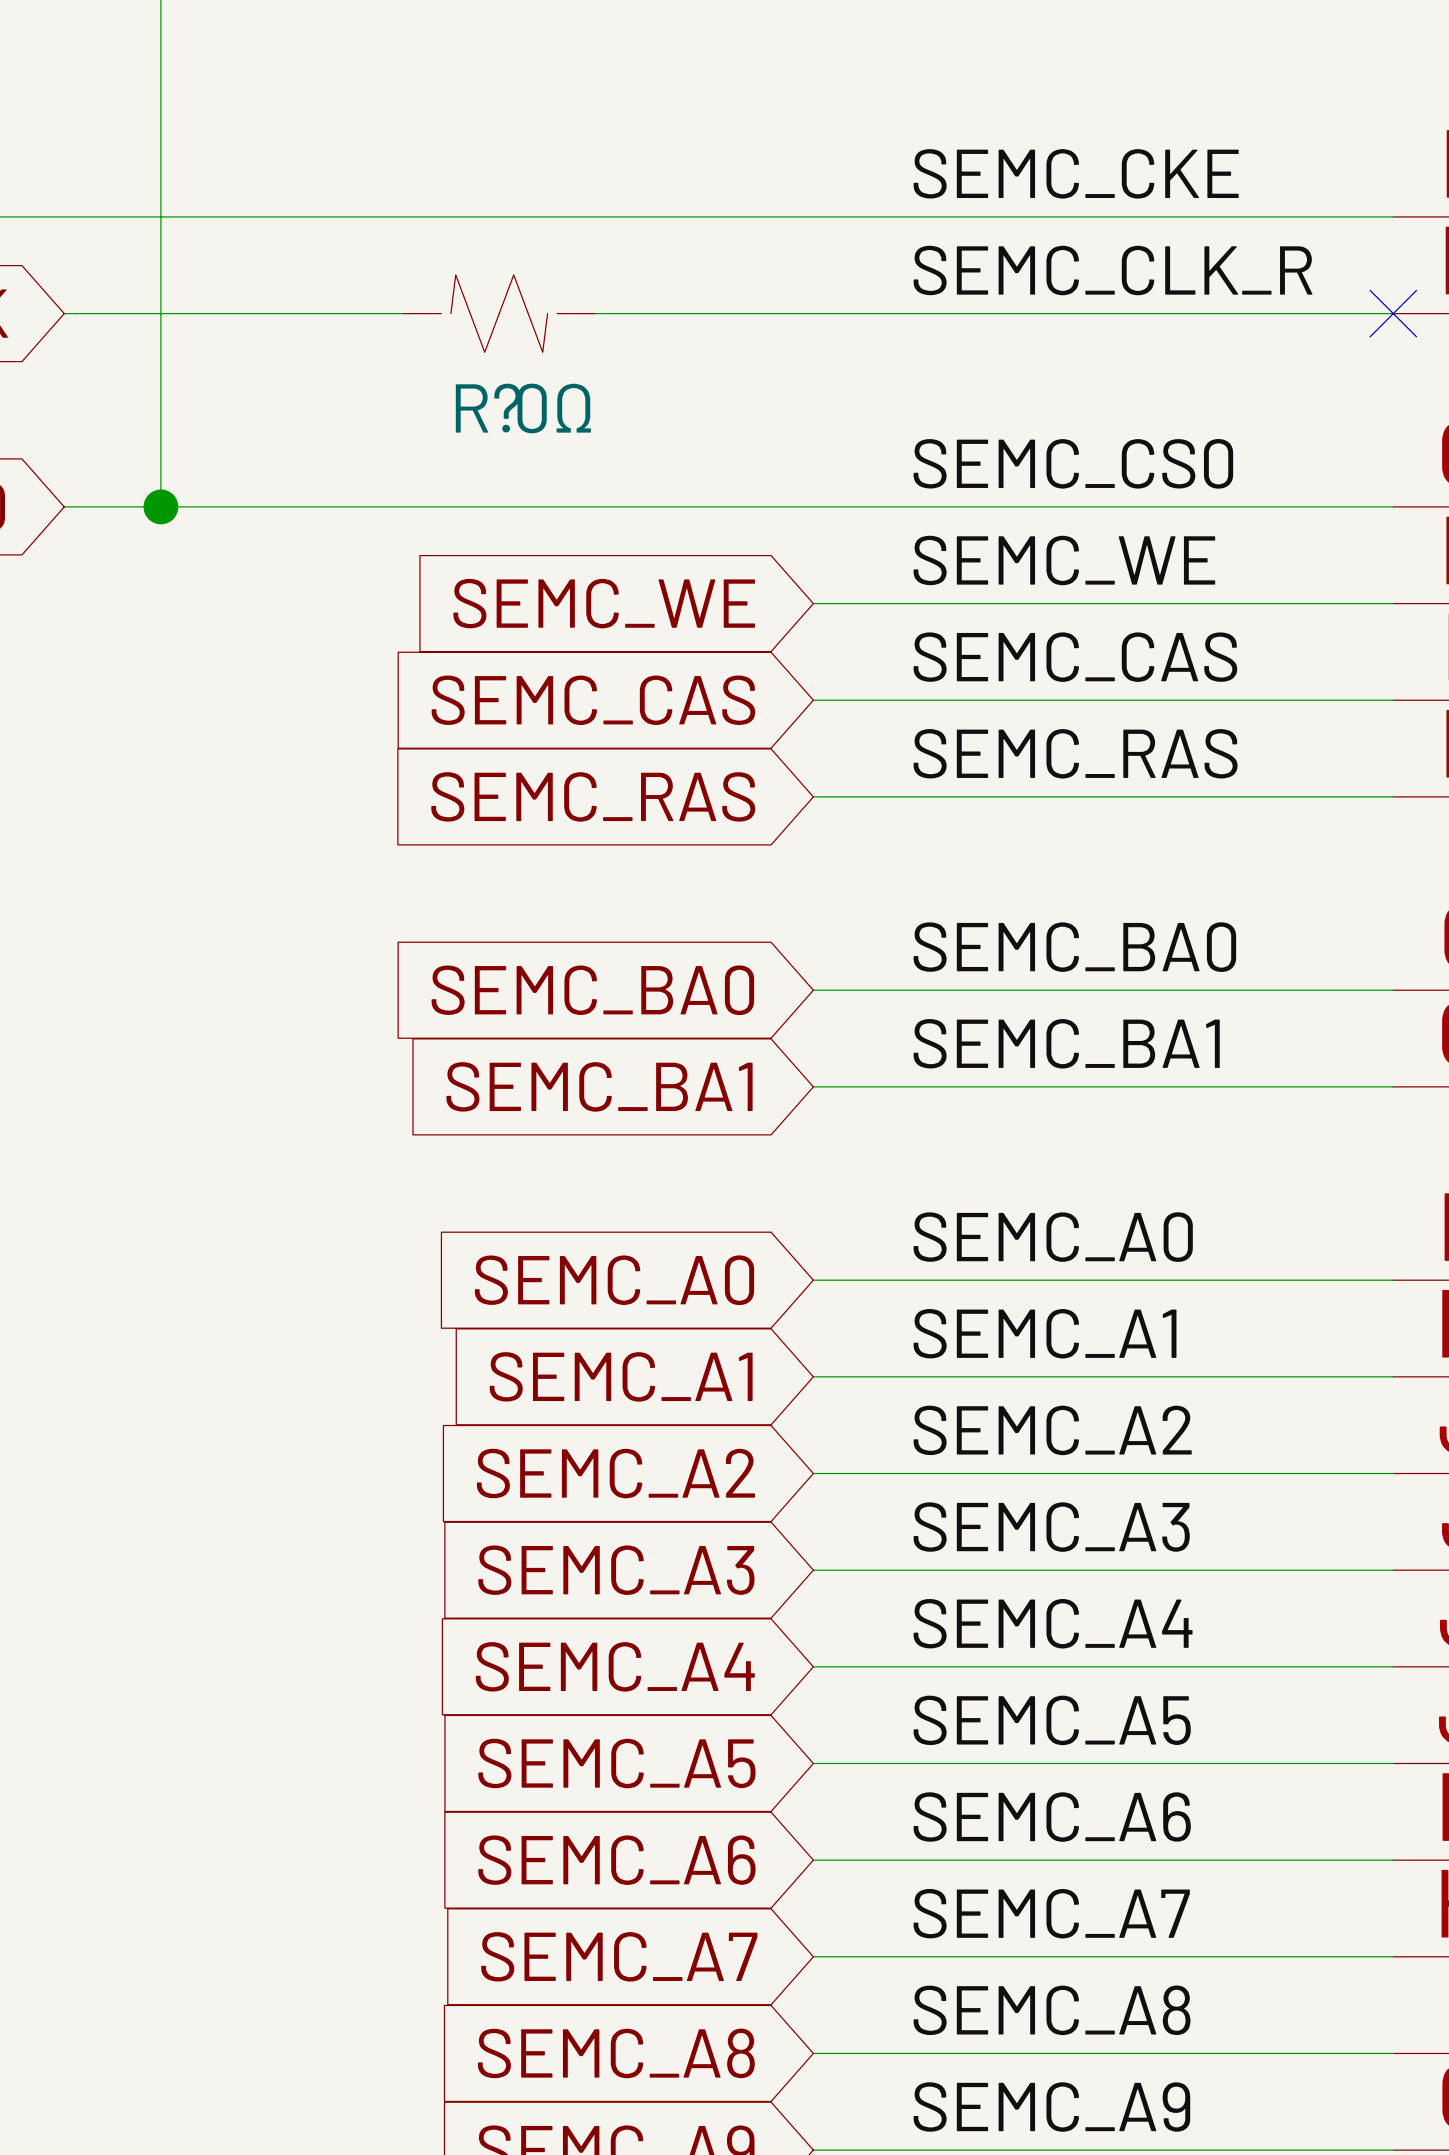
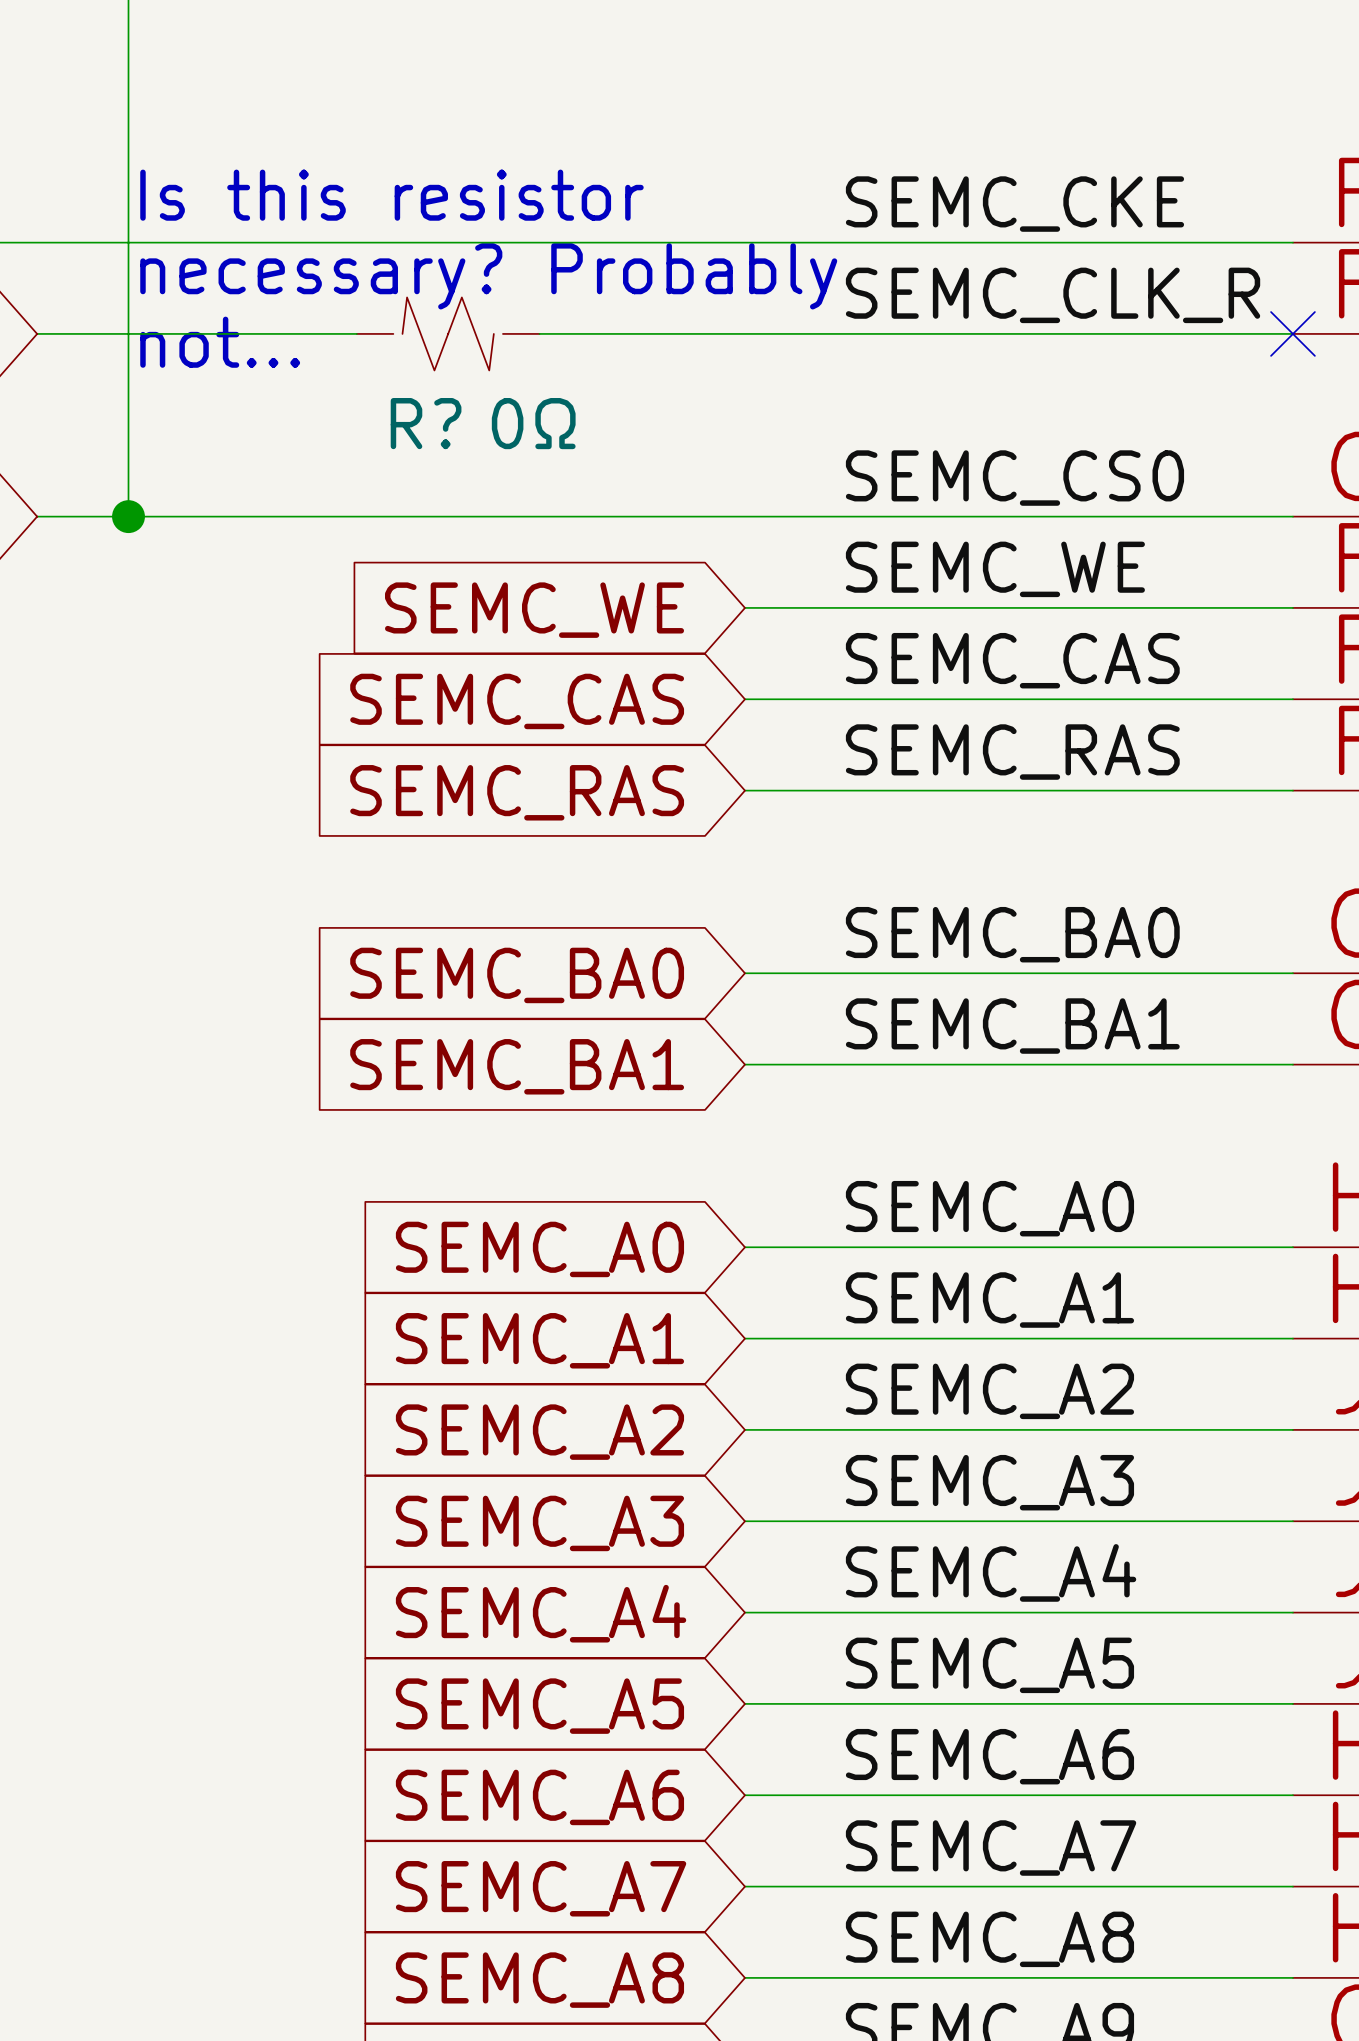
text: none -> Is this resistor (391, 195)
text: none -> necessary? Probably (488, 276)
text: none -> not... (220, 342)
R? value position: 0Ω (554, 408) -> 0Ω (533, 423)

